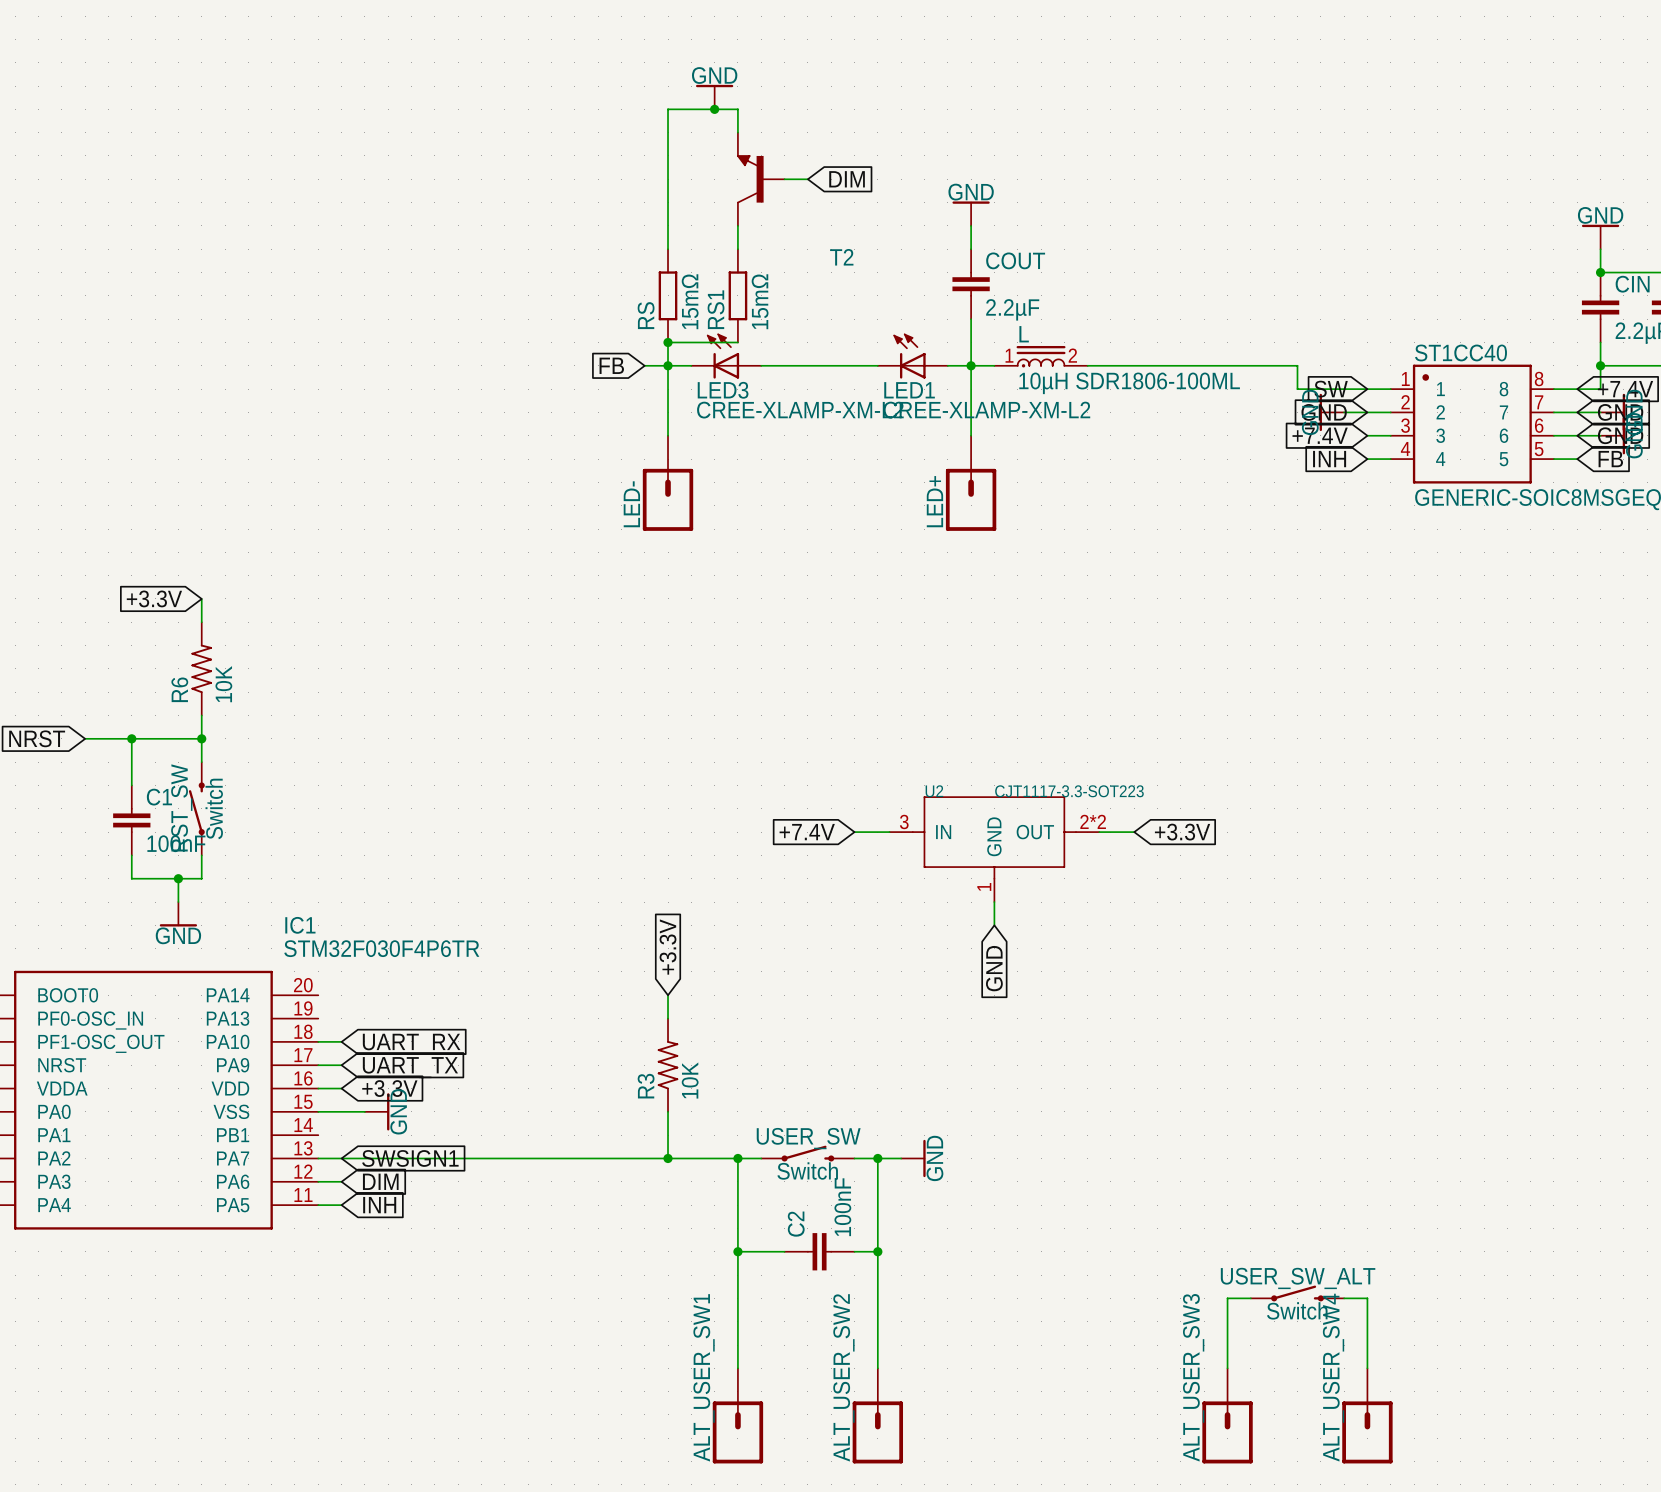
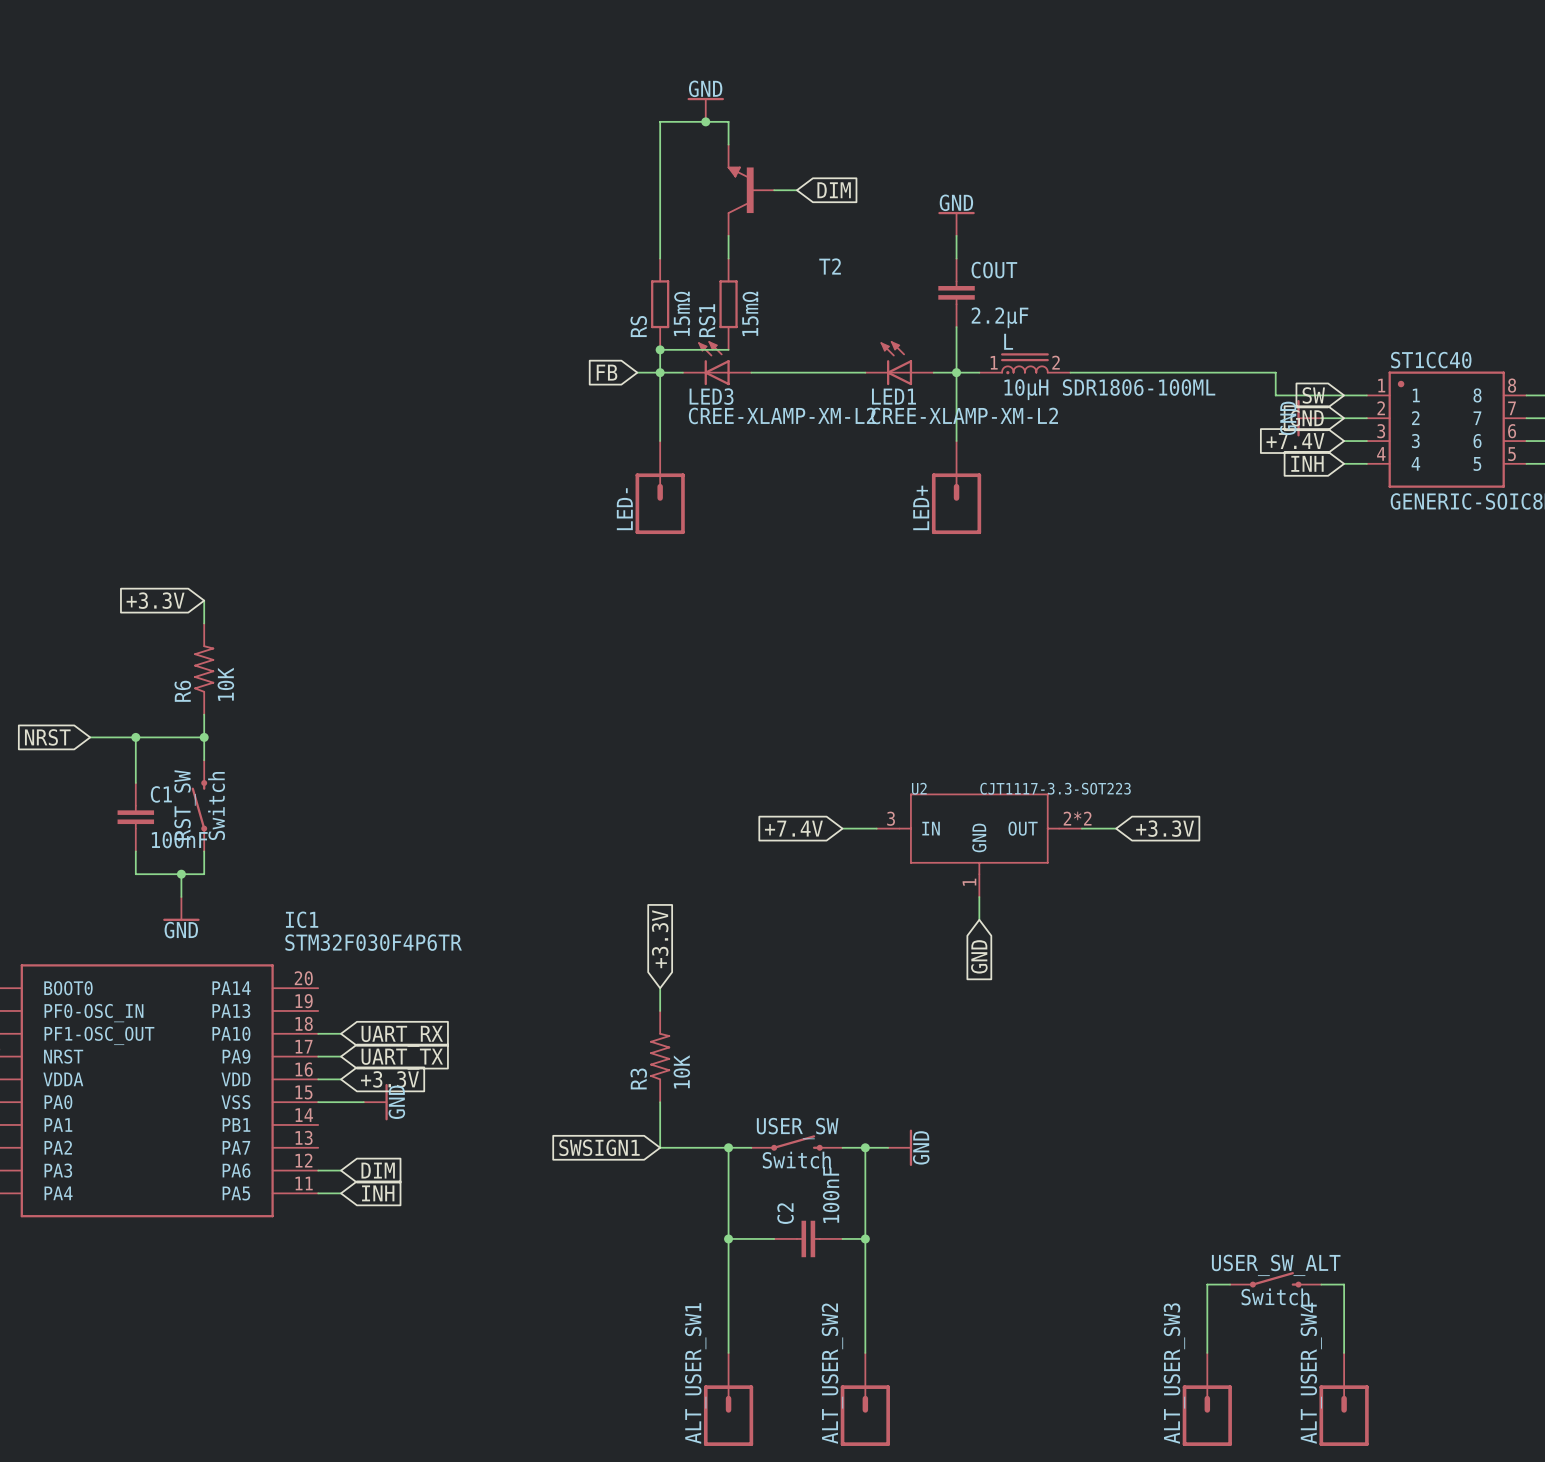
wire: (318, 1158) (668, 1158) -> none
global label: SWSIGN1 (410, 1158) -> none
global label: none -> SWSIGN1 (599, 1147)
junction: (668, 1158) -> none

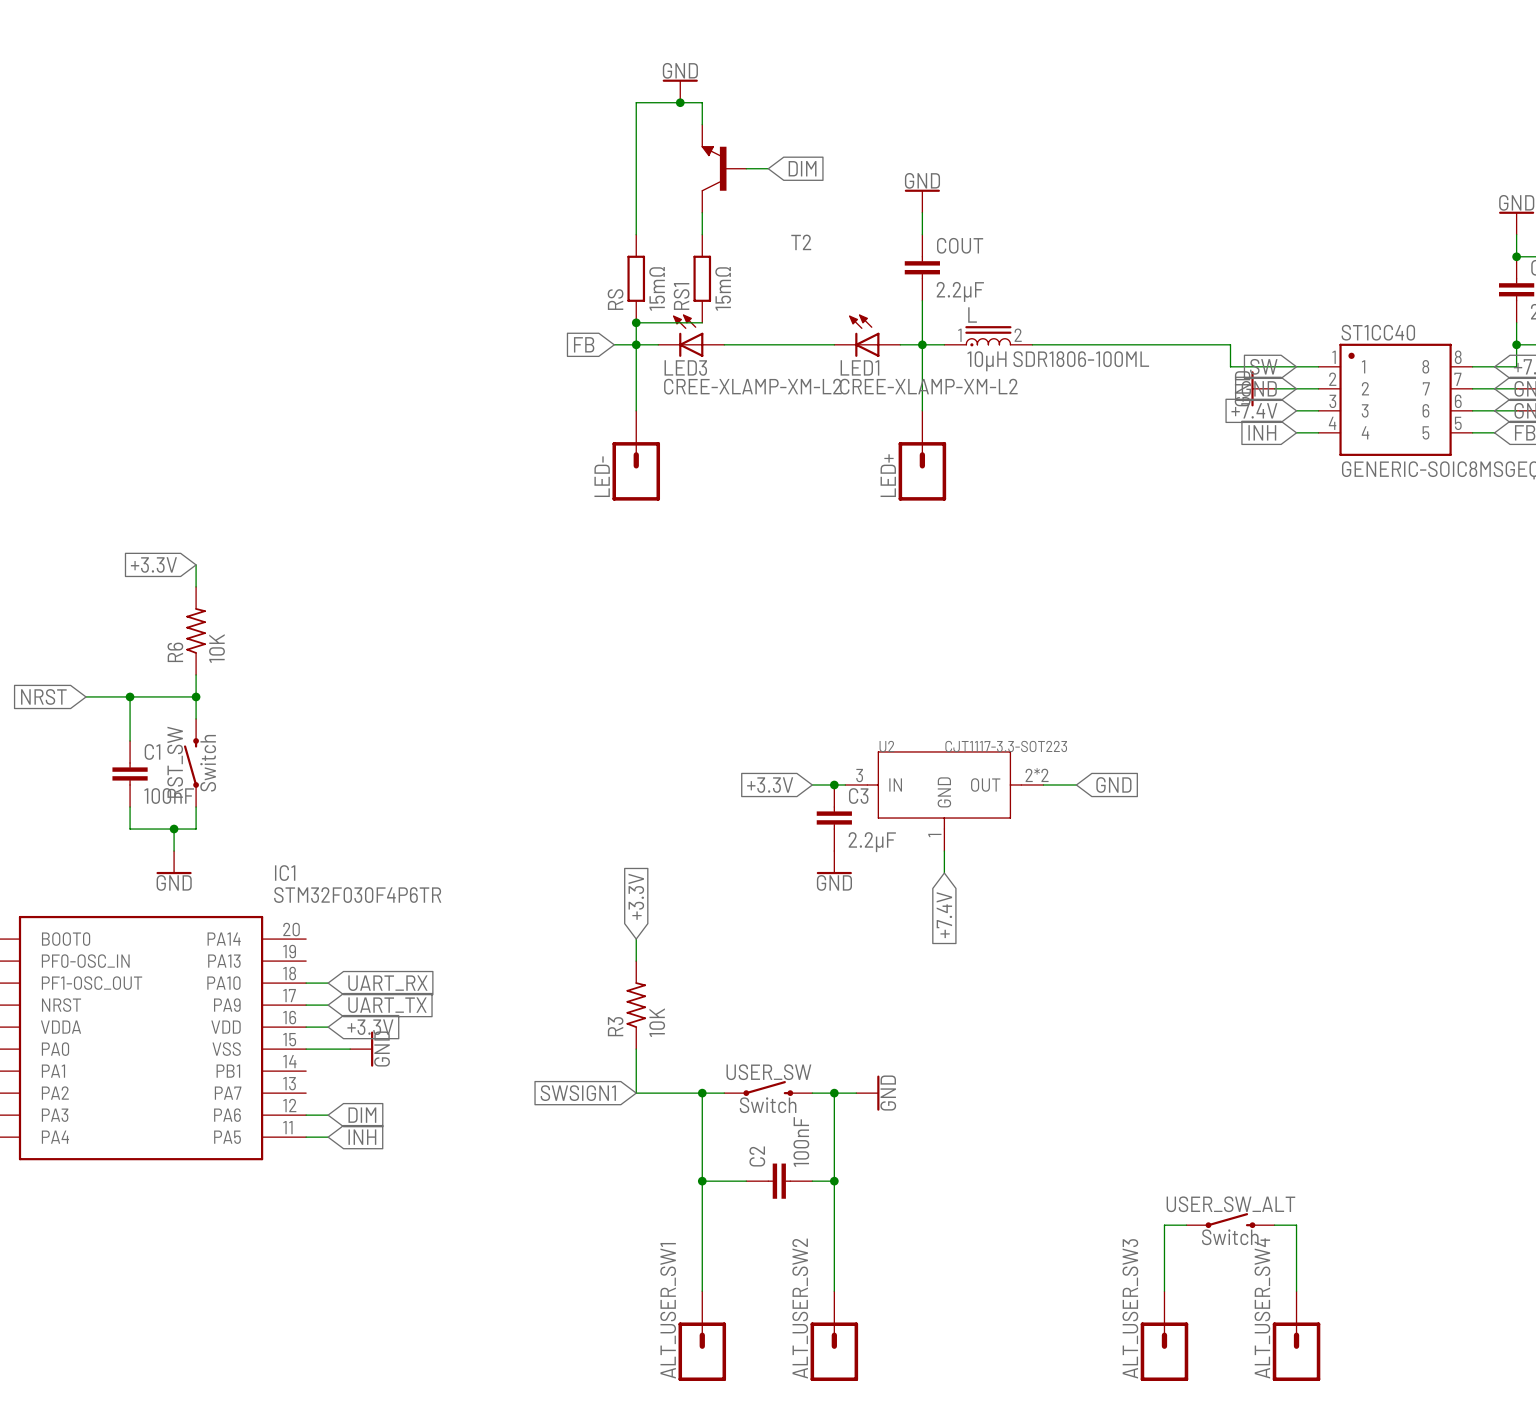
global label: +7.4V (793, 828) -> +3.3V (770, 785)
junction: none -> (834, 785)
global label: +3.3V (1165, 828) -> GND (1113, 785)
C3: none -> 2.2µF (834, 818)
power symbol: none -> GND (834, 862)
global label: GND (979, 956) -> +7.4V (944, 915)

